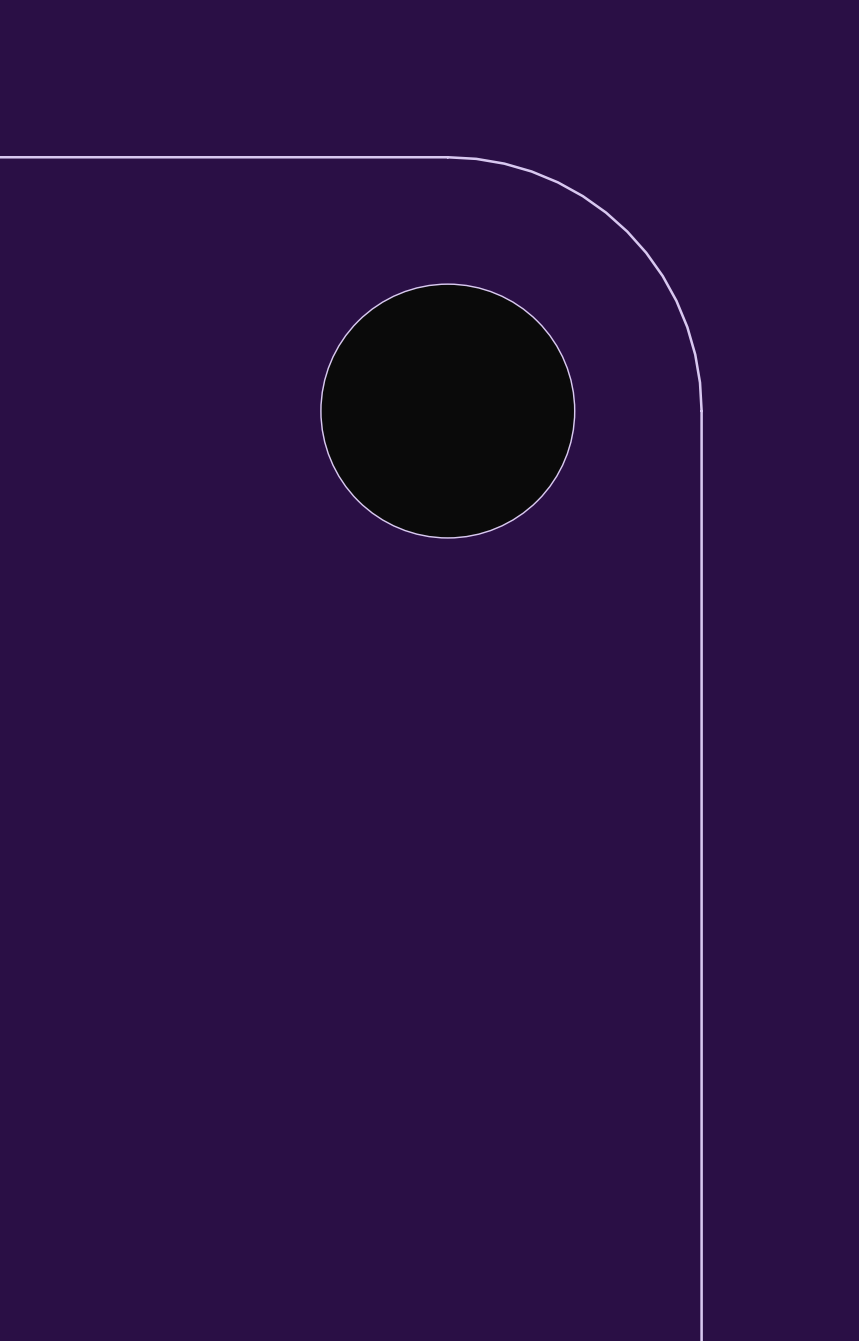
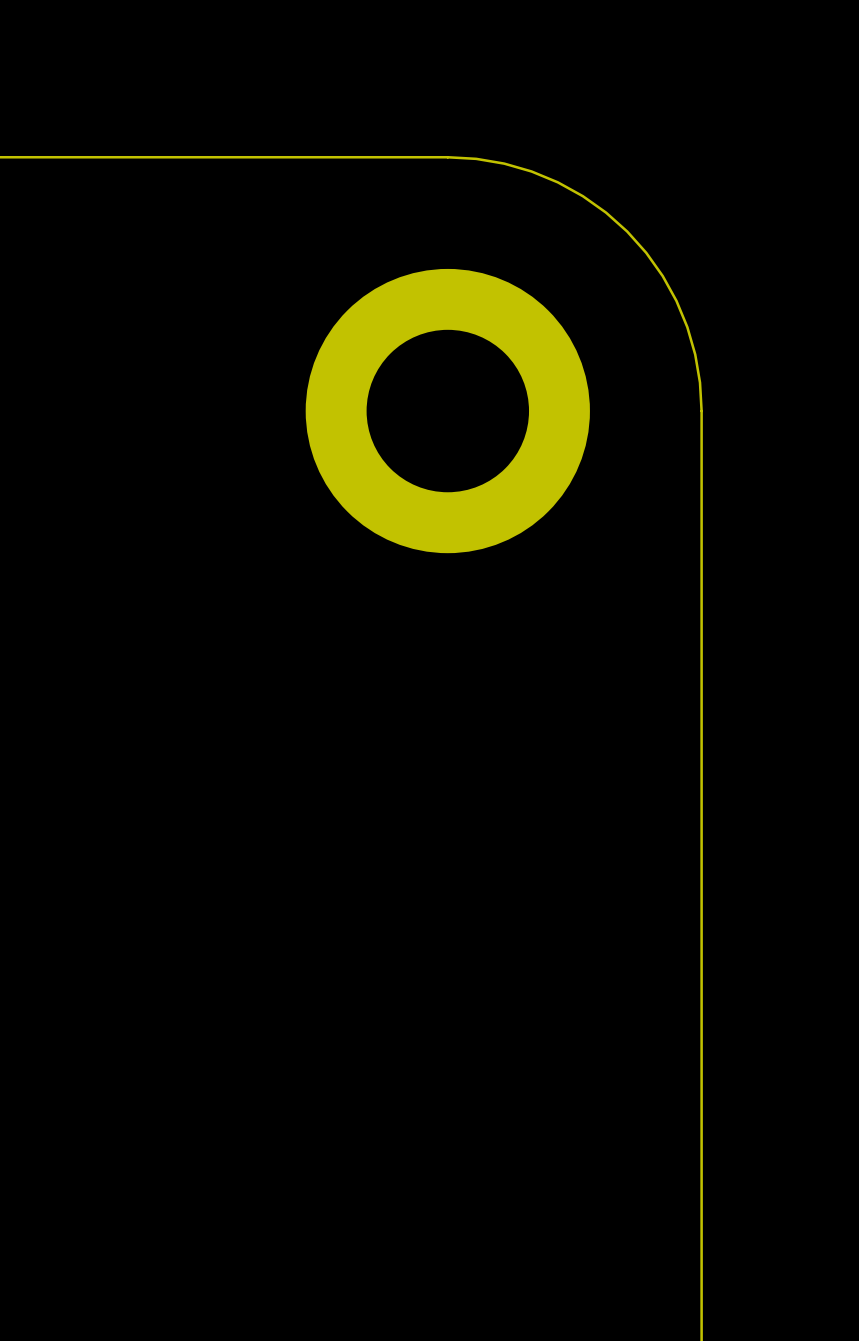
part footprint: [320, 284, 575, 538] -> [305, 268, 590, 554]

